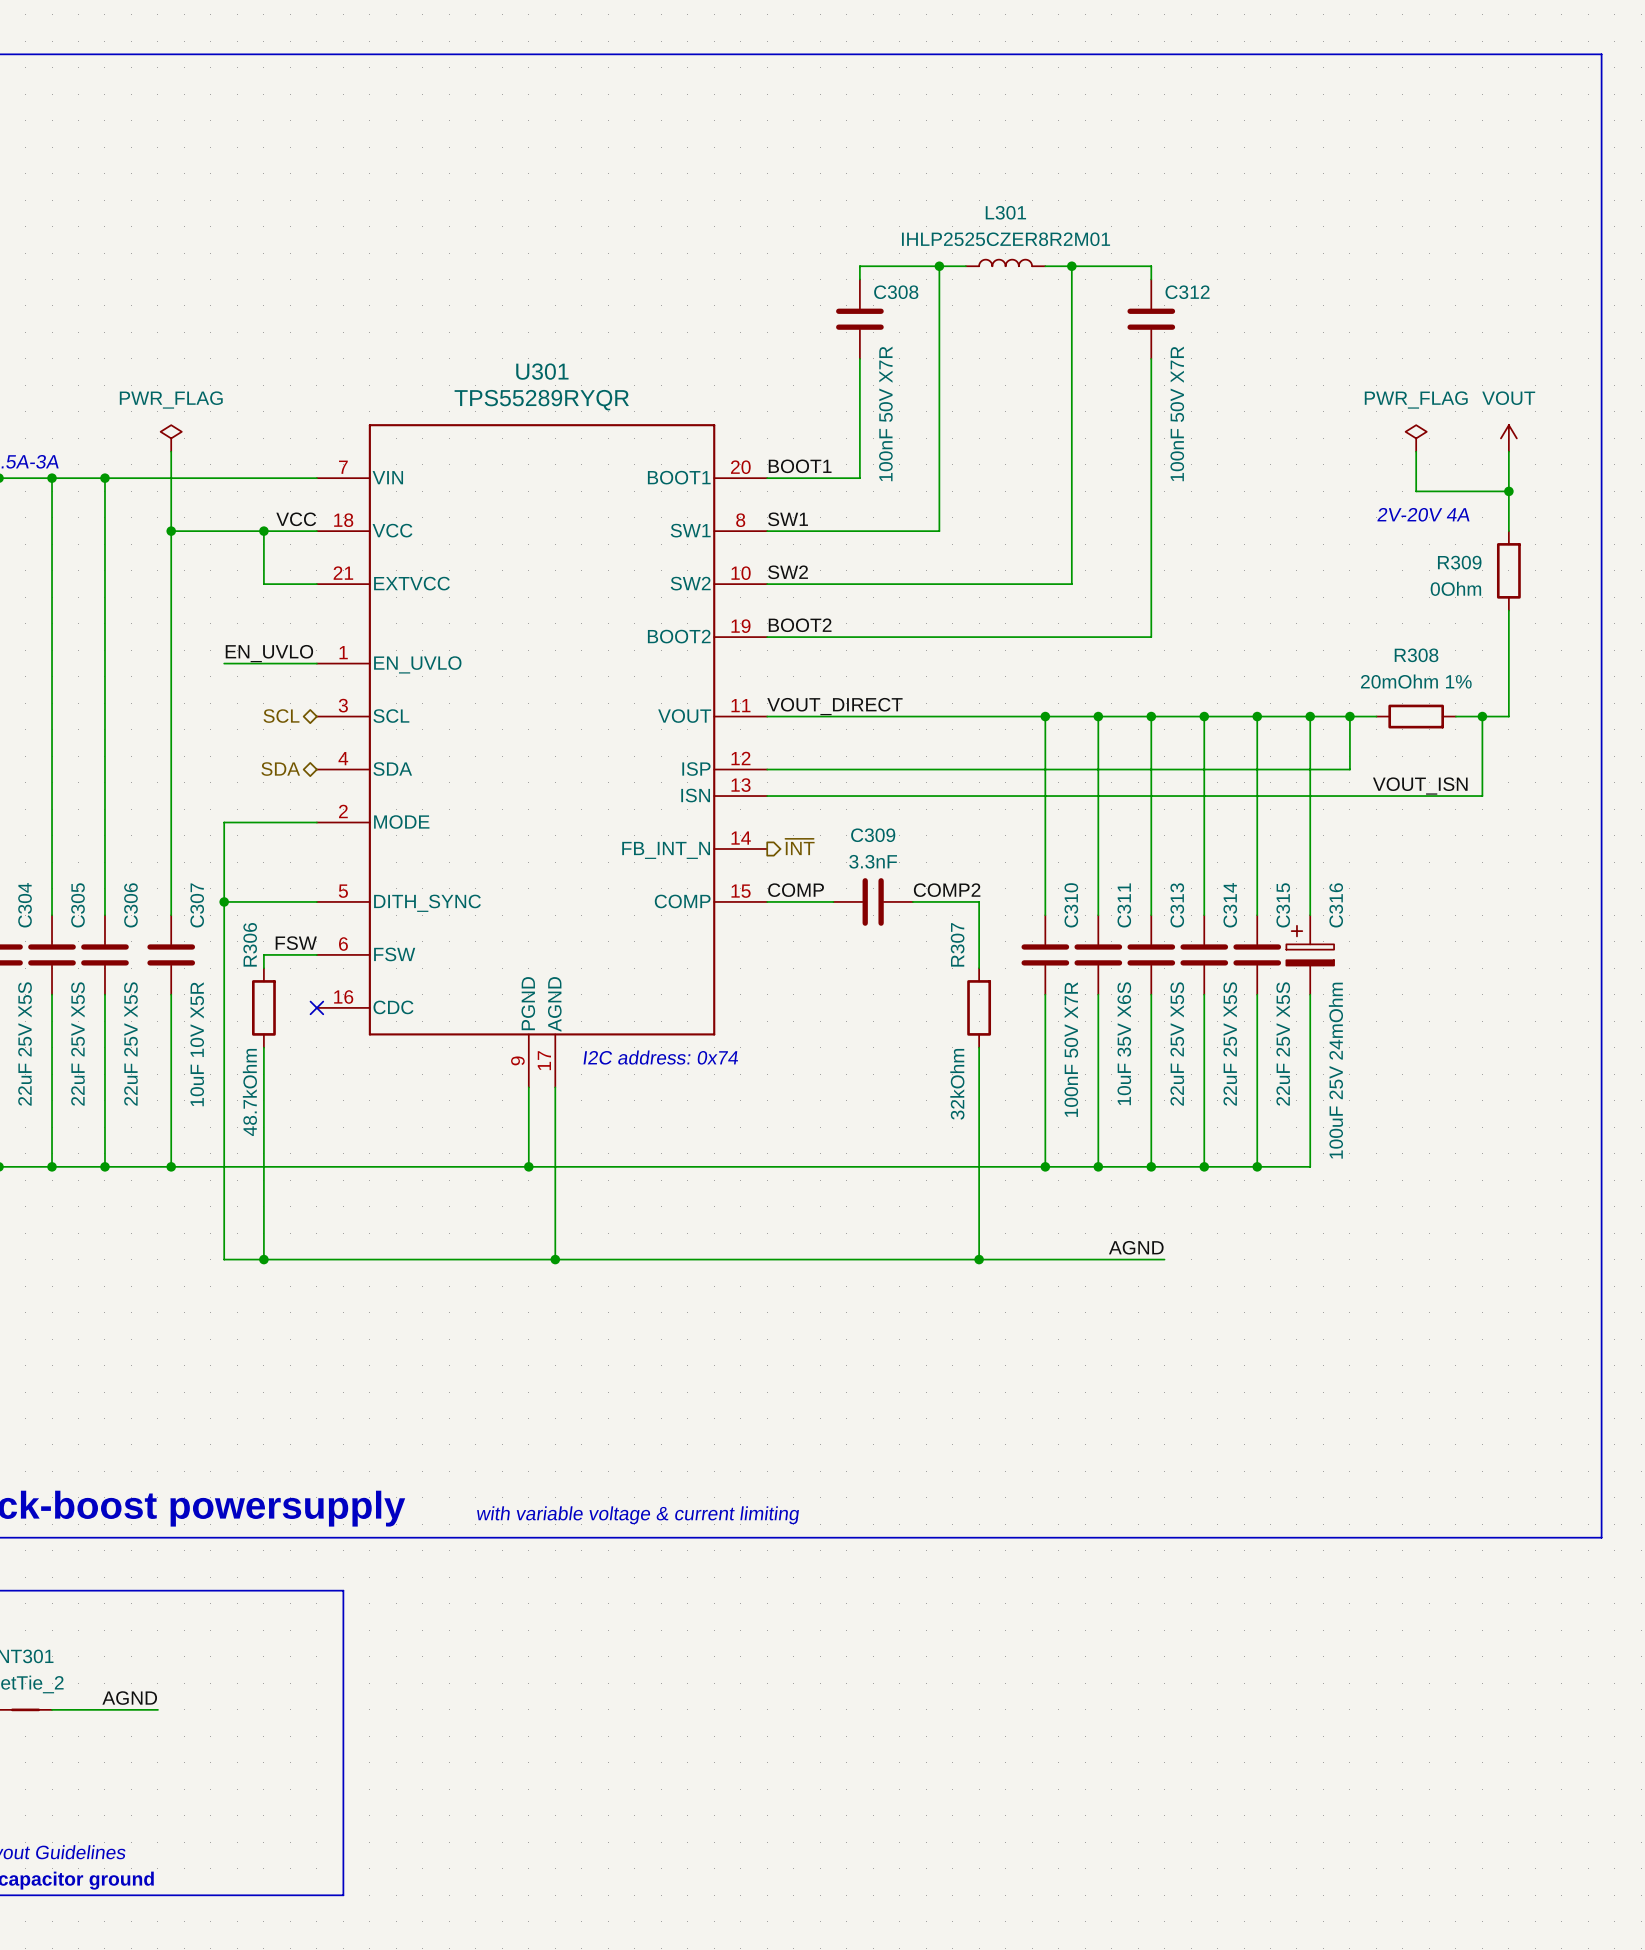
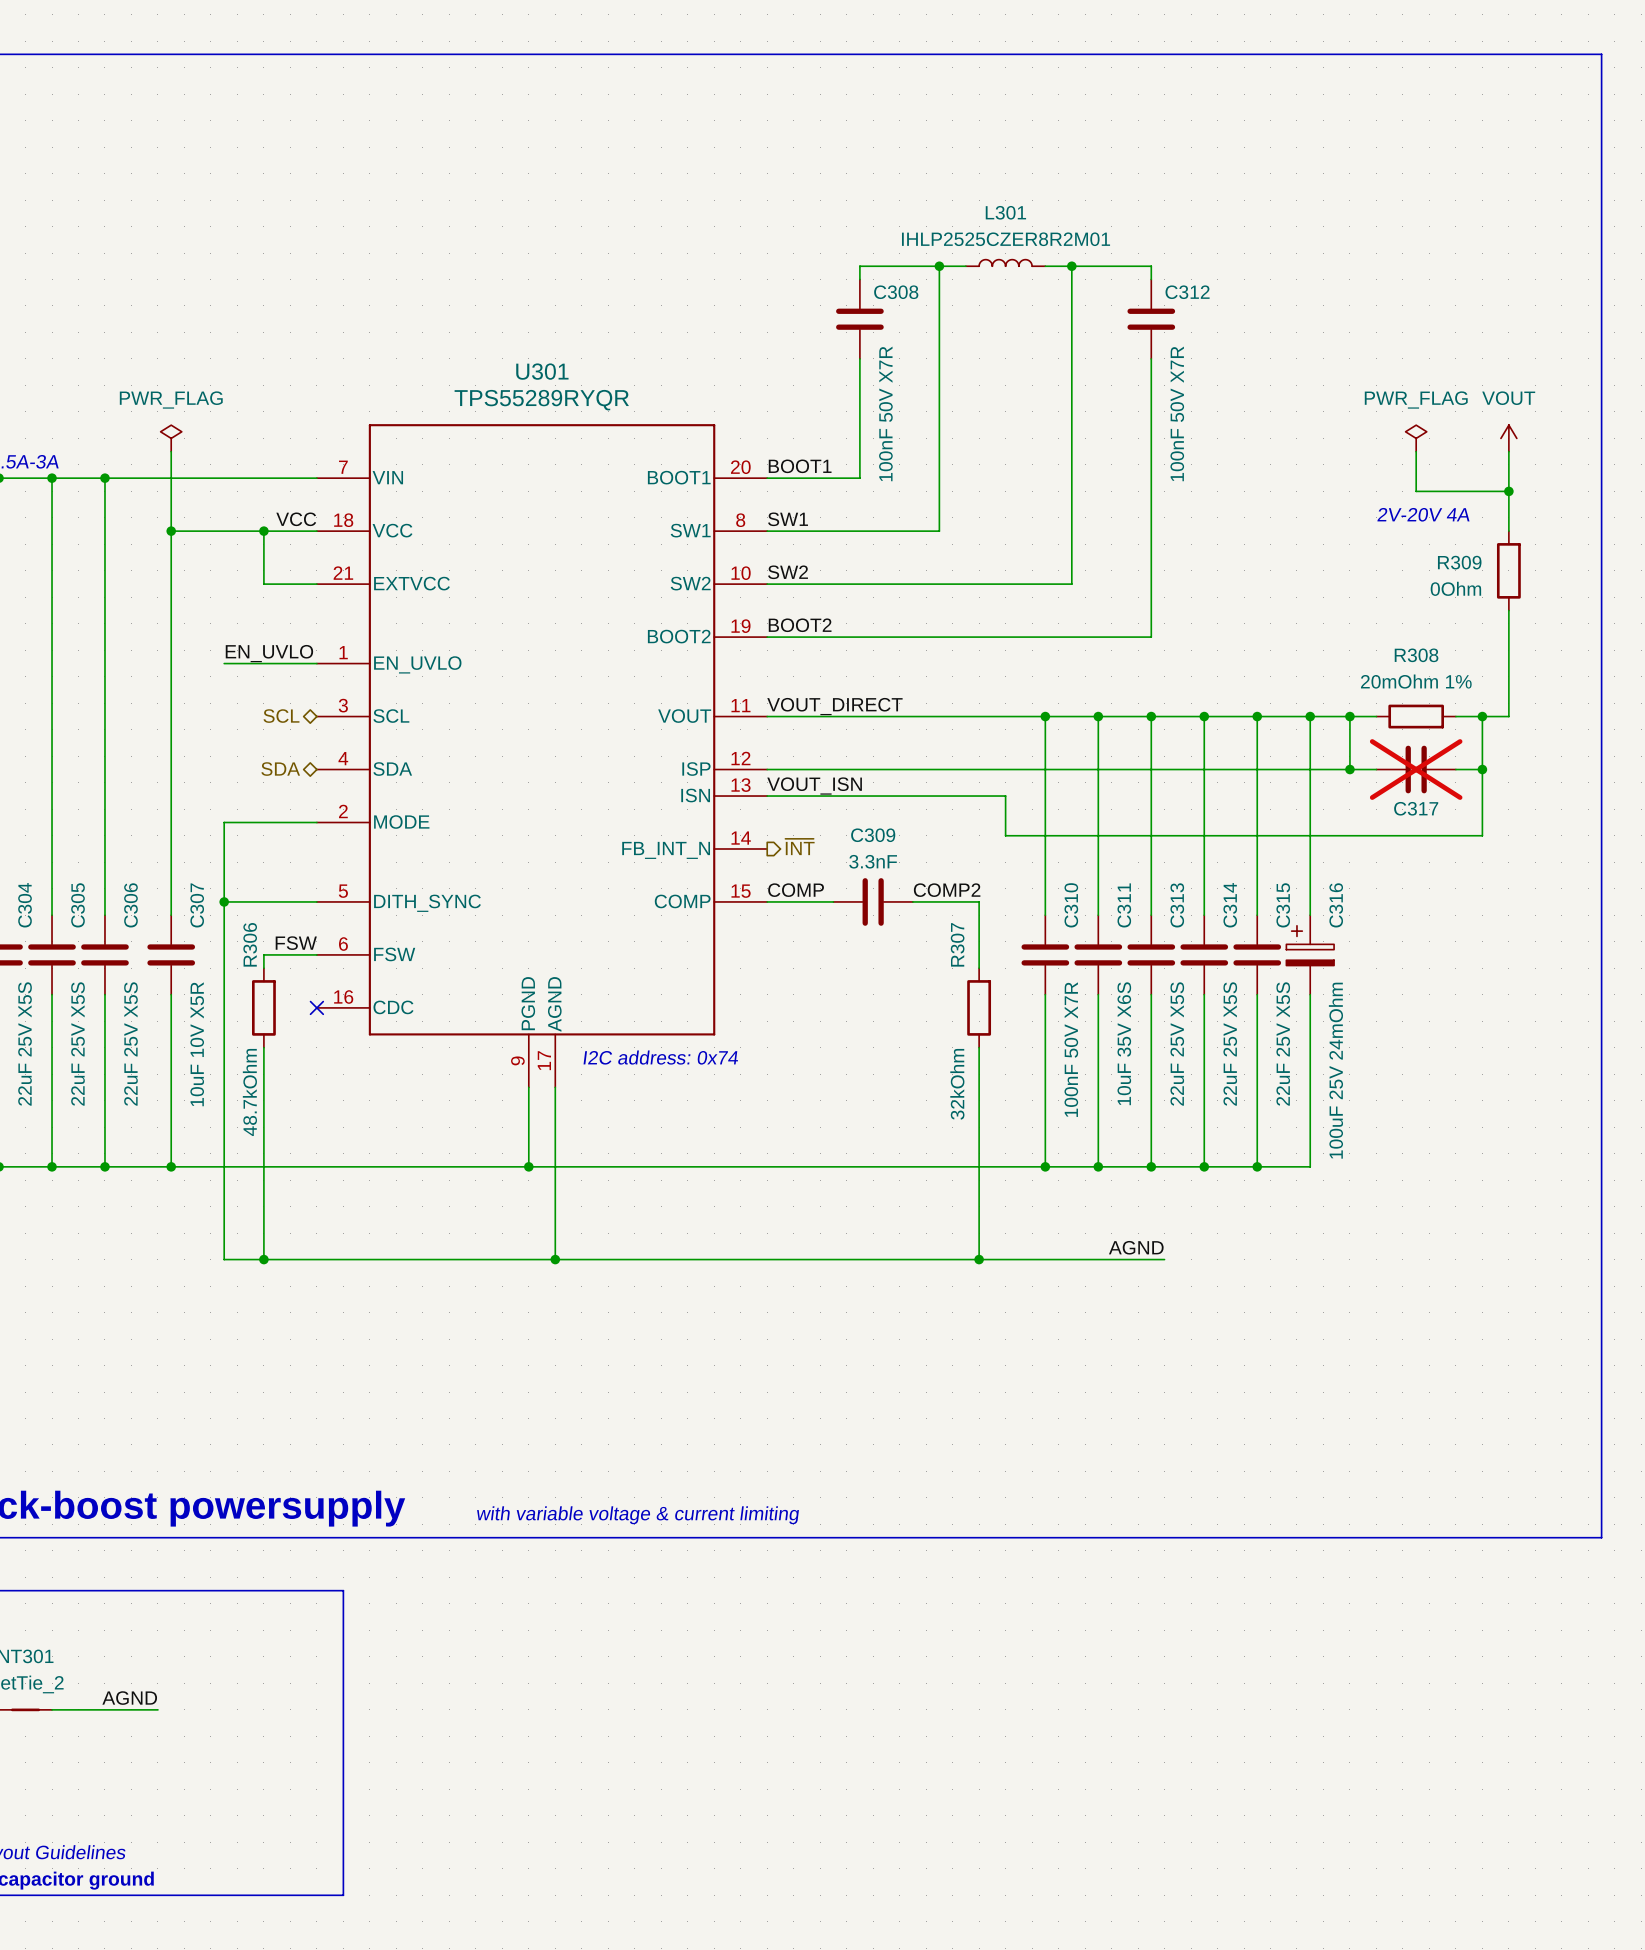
wire: none -> (1349, 769) (1376, 769)
junction: none -> (1349, 769)
C317: none -> (1416, 769)
wire: none -> (1455, 769) (1482, 769)
junction: none -> (1482, 769)
label: none -> VOUT_ISN (814, 786)
label: VOUT_ISN (1420, 786) -> none
wire: (1005, 796) (1482, 796) -> (1005, 796) (1005, 835) (1482, 835) (1482, 796)

